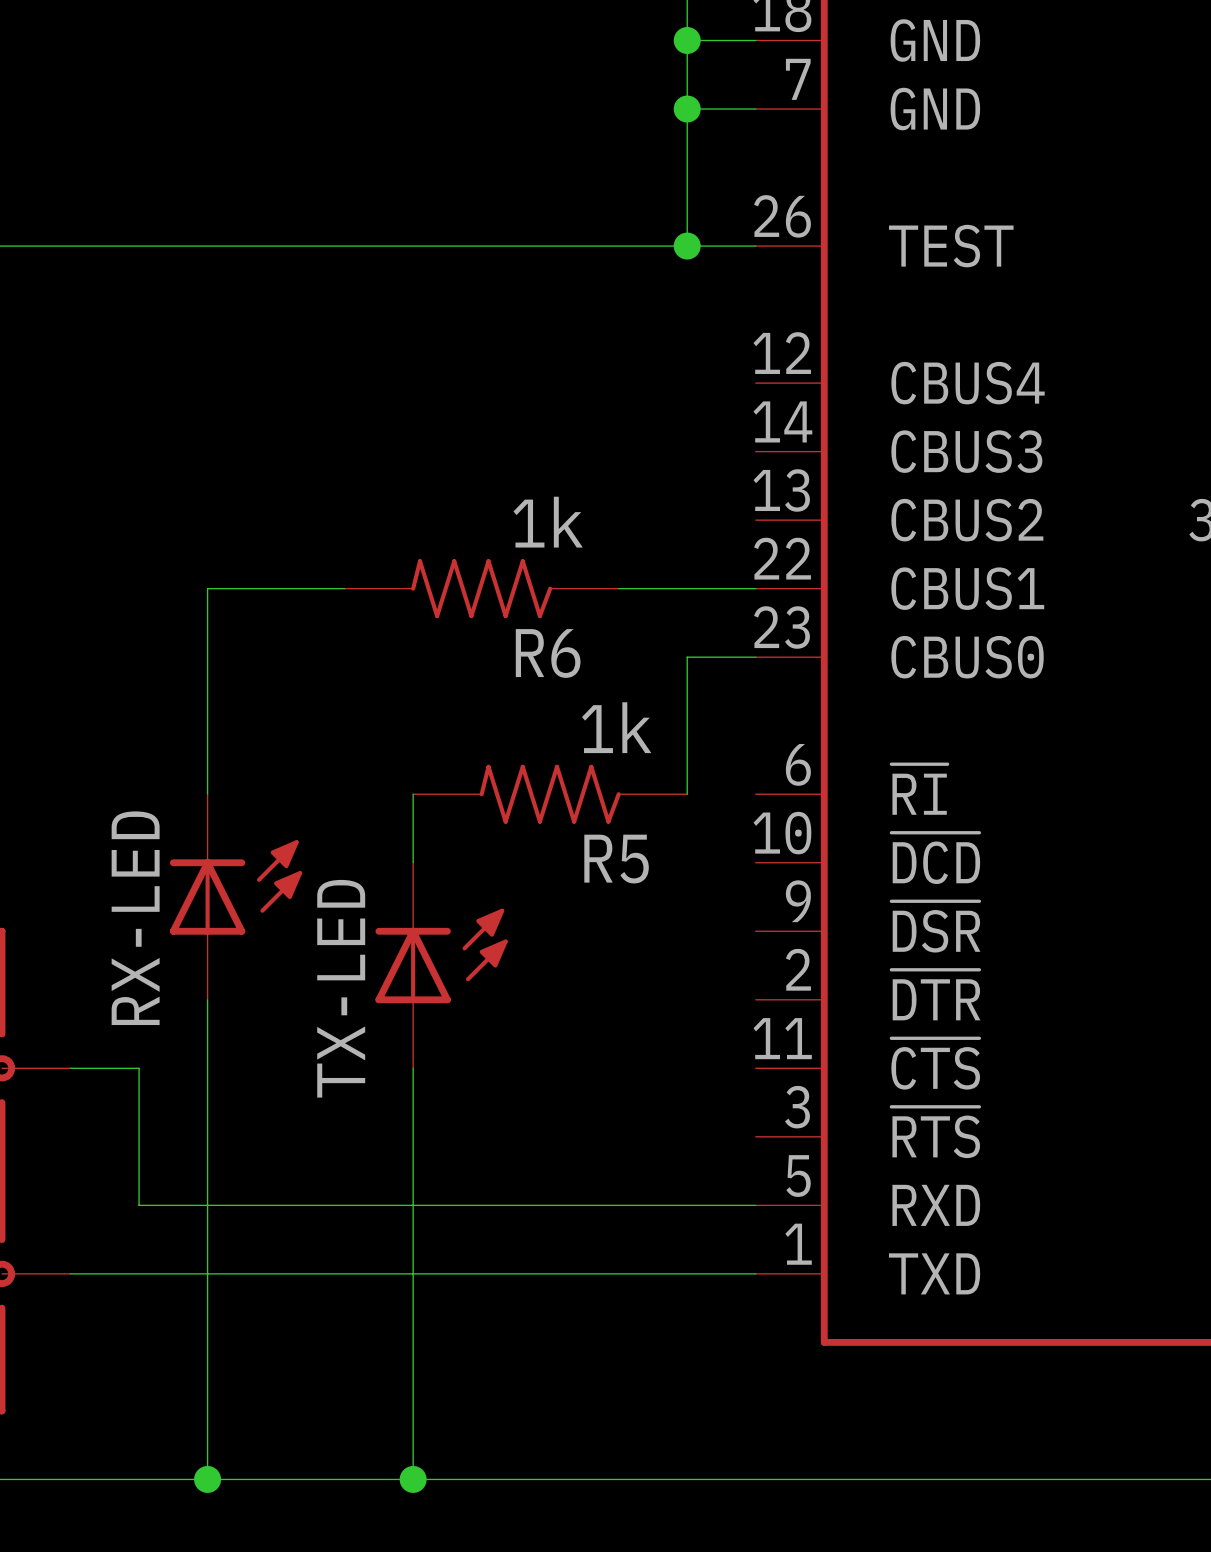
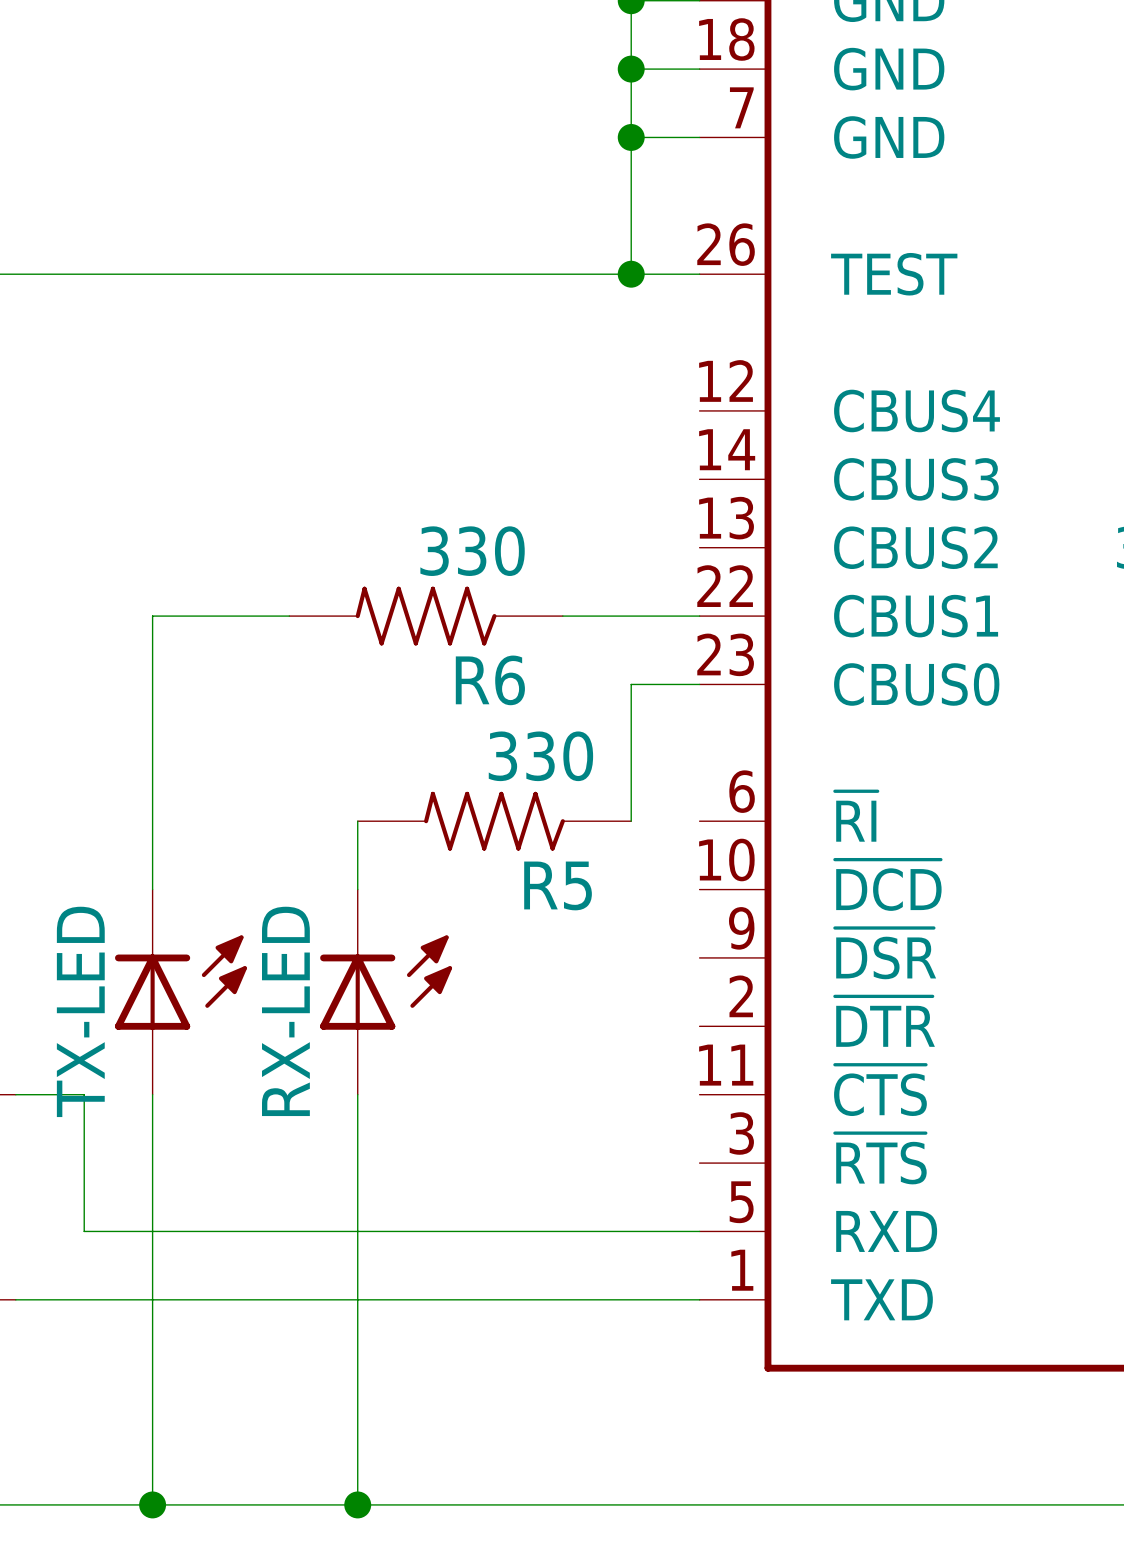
R6 value: 1k (548, 522) -> 330 (472, 551)
R5 value: 1k (616, 727) -> 330 (540, 756)
RX-LED: (236, 897) -> none
TX-LED: none -> (180, 992)
TX-LED name: TX-LED (341, 988) -> RX-LED (285, 1011)

